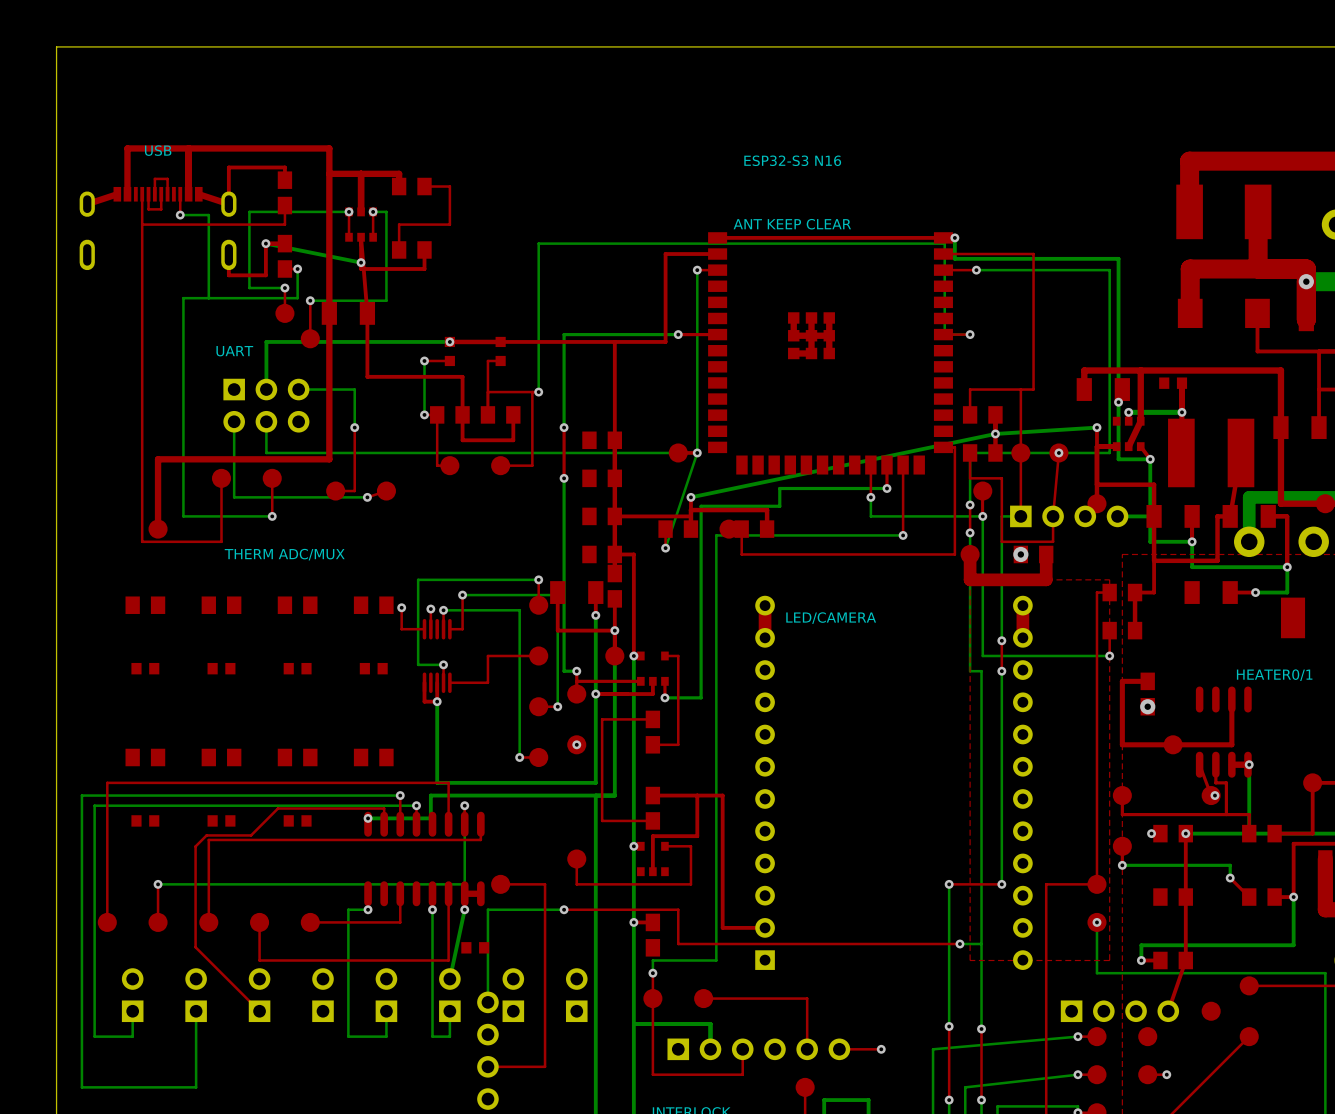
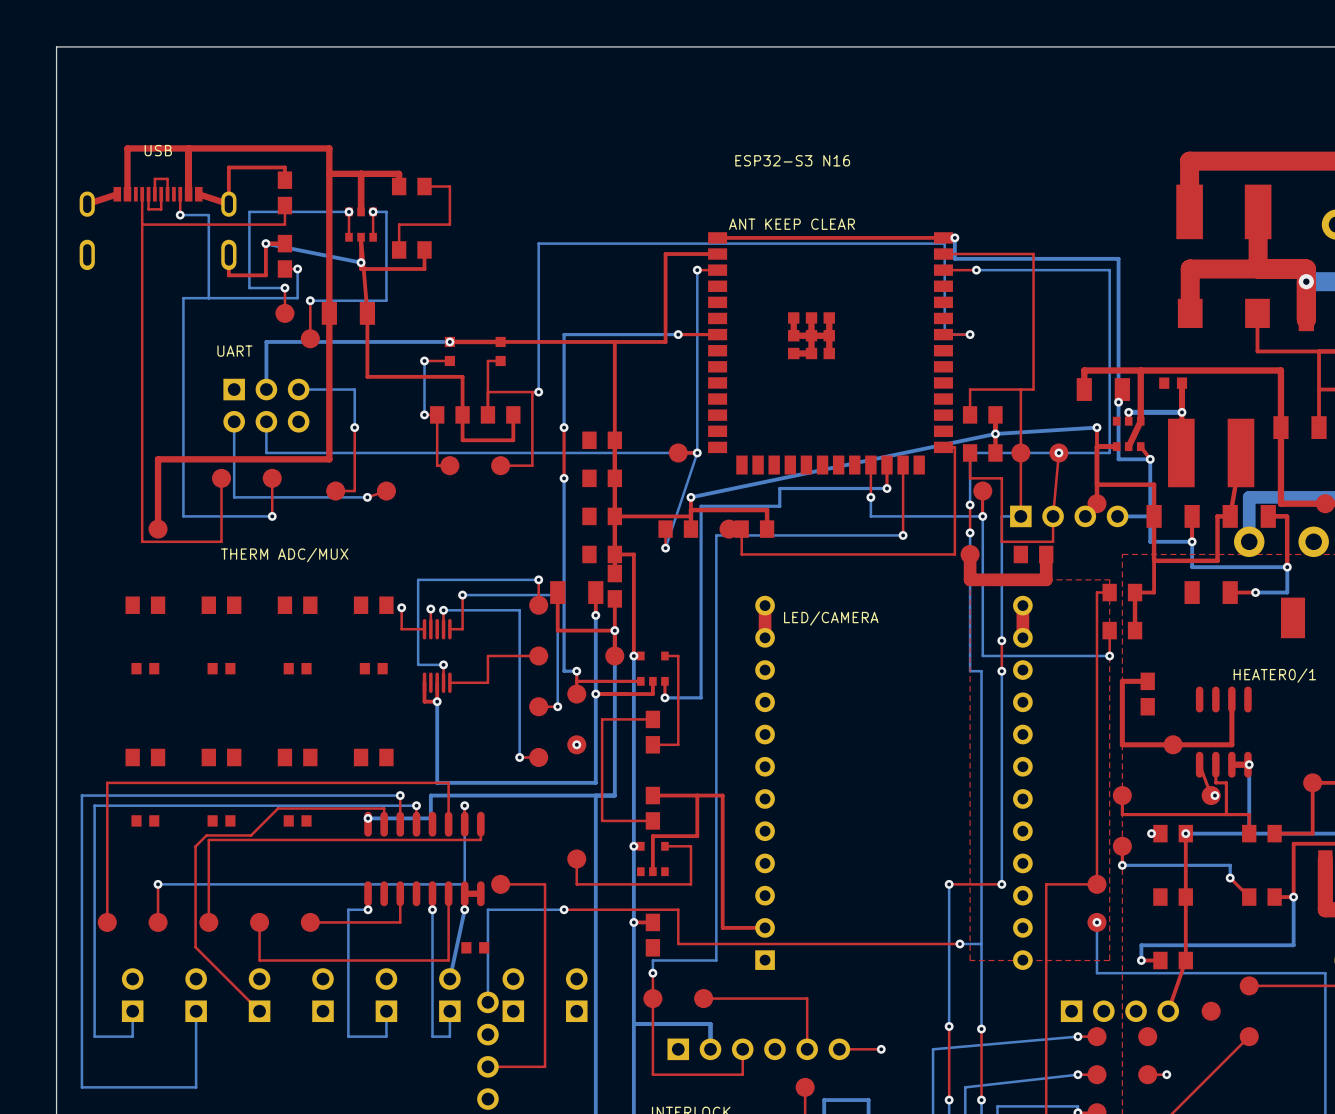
via: (1020, 554) -> none
via: (1147, 706) -> none

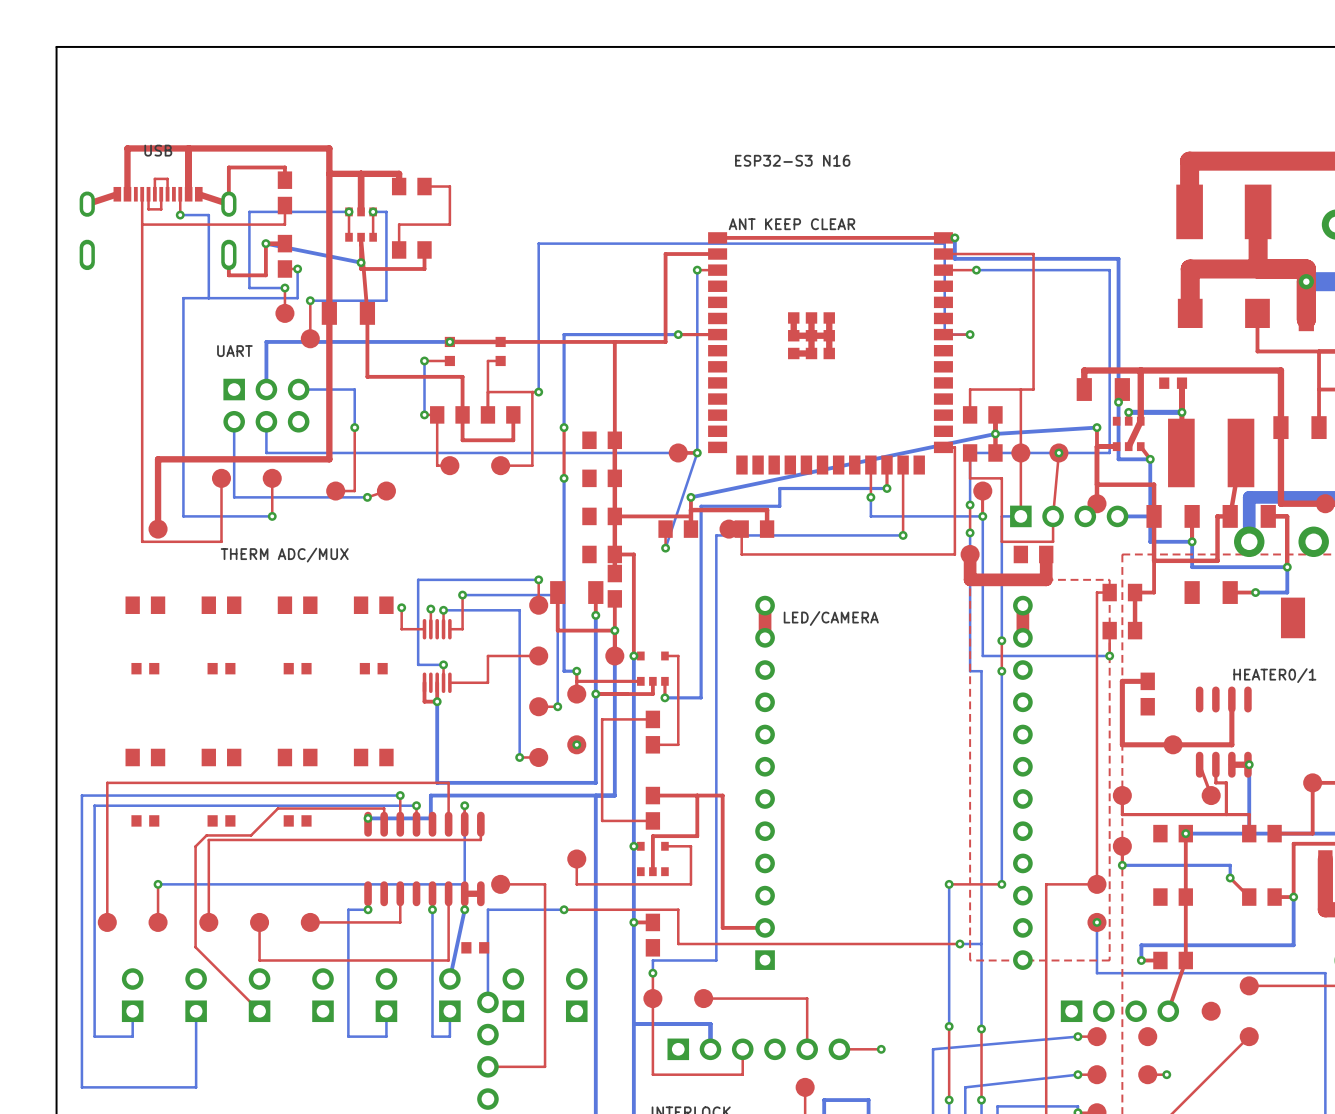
via: (1214, 795) -> none
via: (1151, 833) -> none

